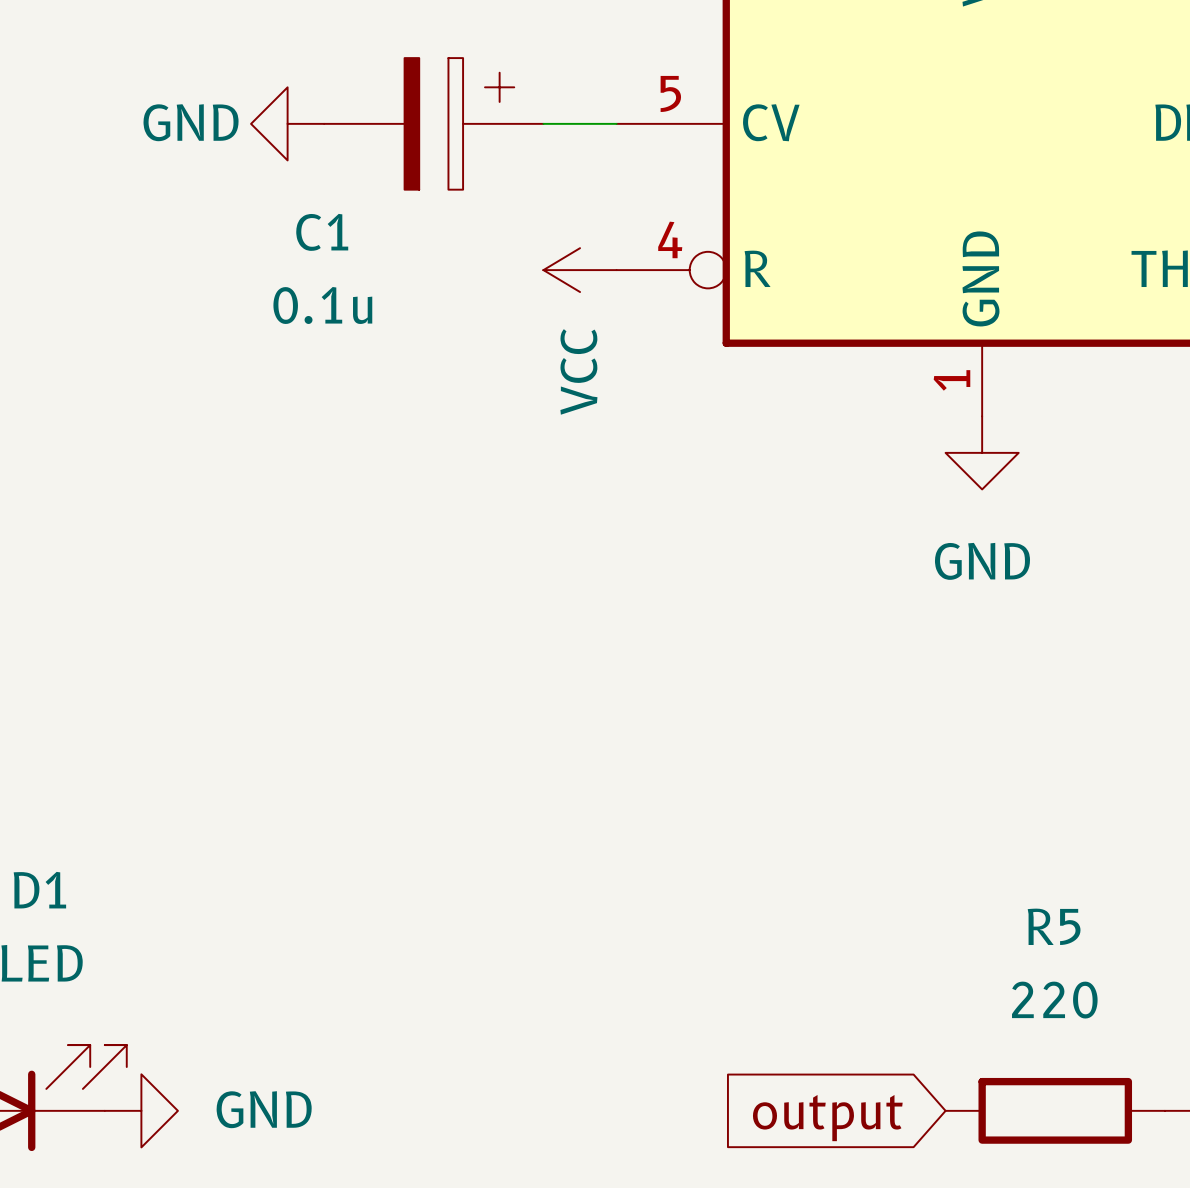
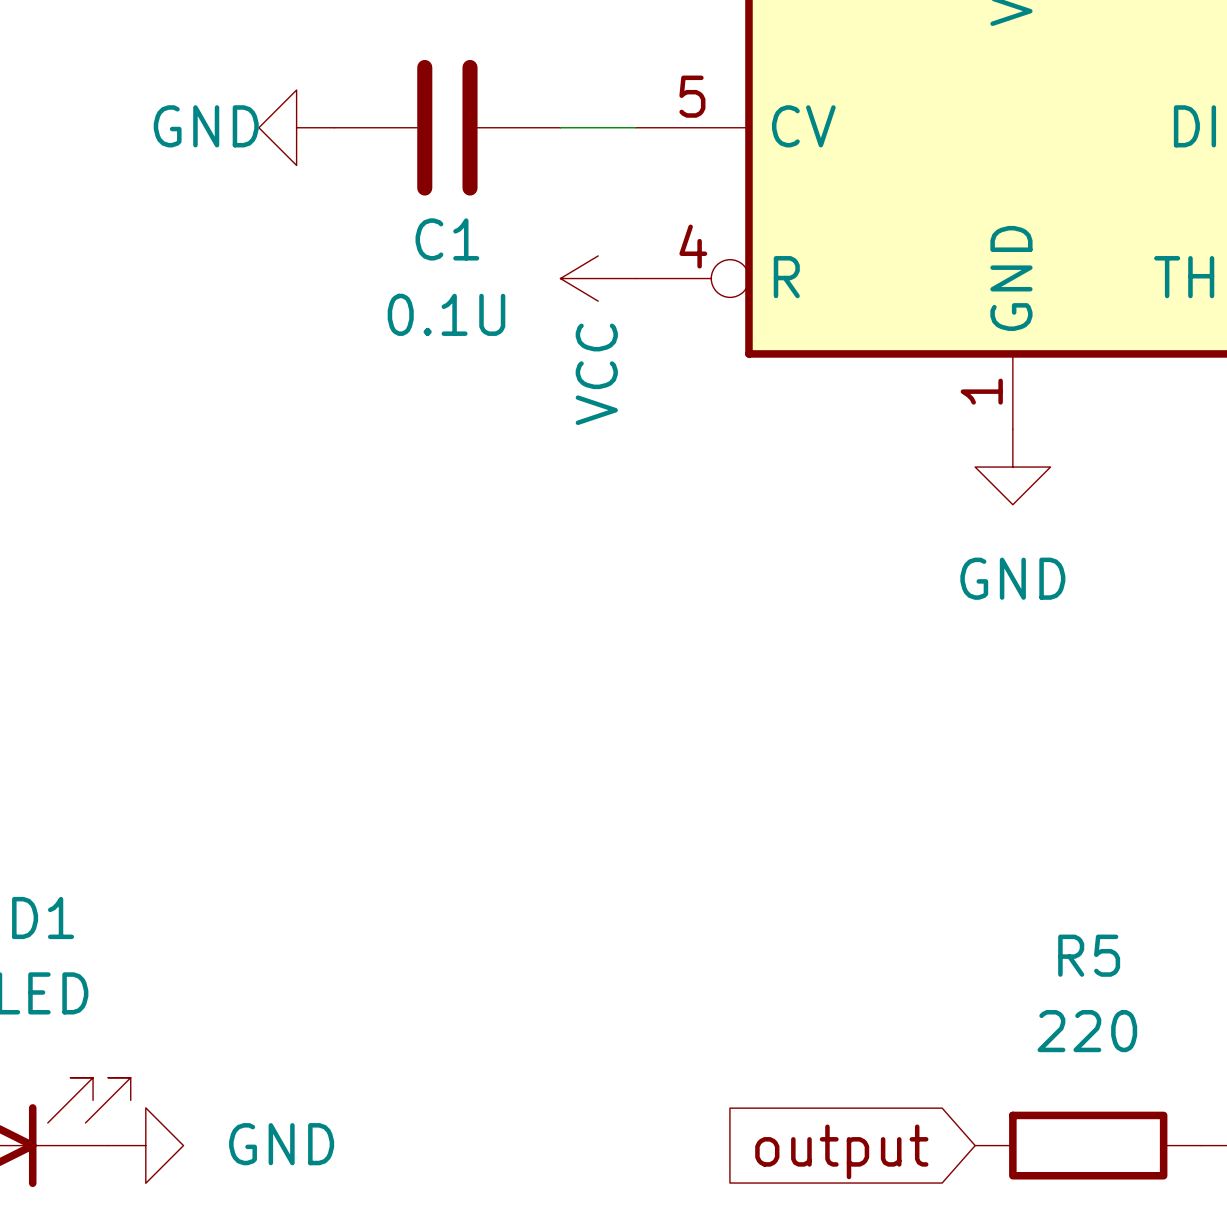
C1 symbol: [324, 58, 544, 190] -> [334, 59, 561, 196]
C1 name position: C1 (322, 232) -> C1 (447, 239)
C1 value: 0.1u (322, 305) -> 0.1U (446, 314)

